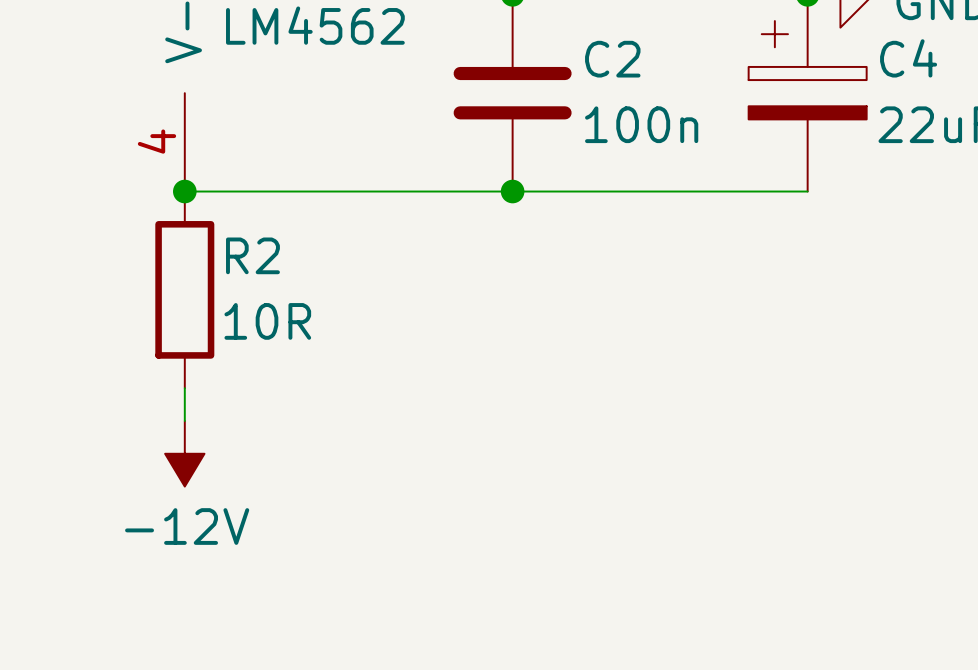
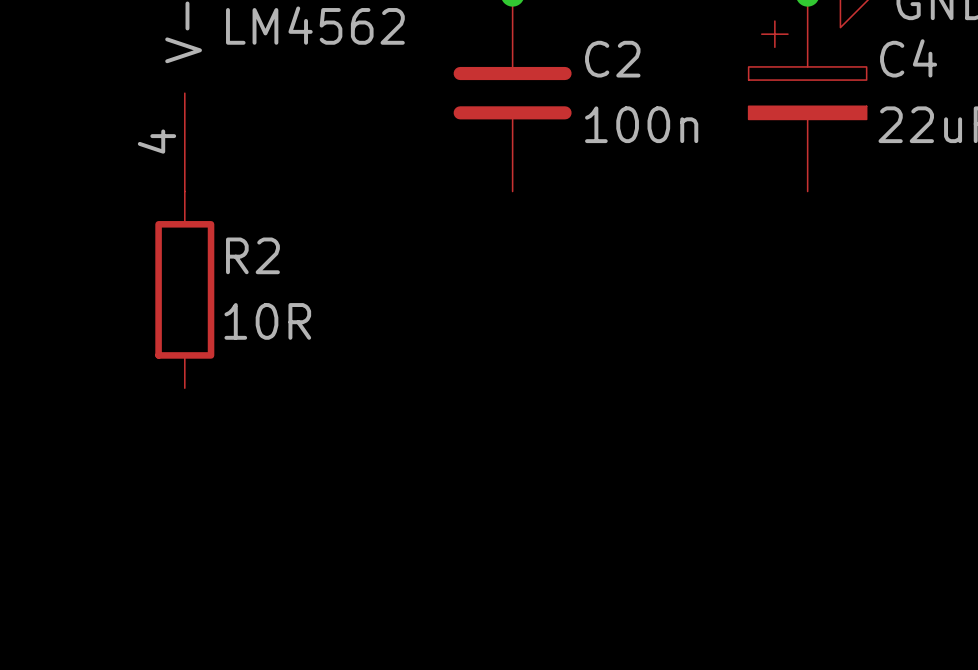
wire: (184, 191) (807, 191) -> none
junction: (184, 191) -> none
junction: (512, 191) -> none
wire: (184, 388) (184, 420) -> none
power symbol: -12V (184, 453) -> none

